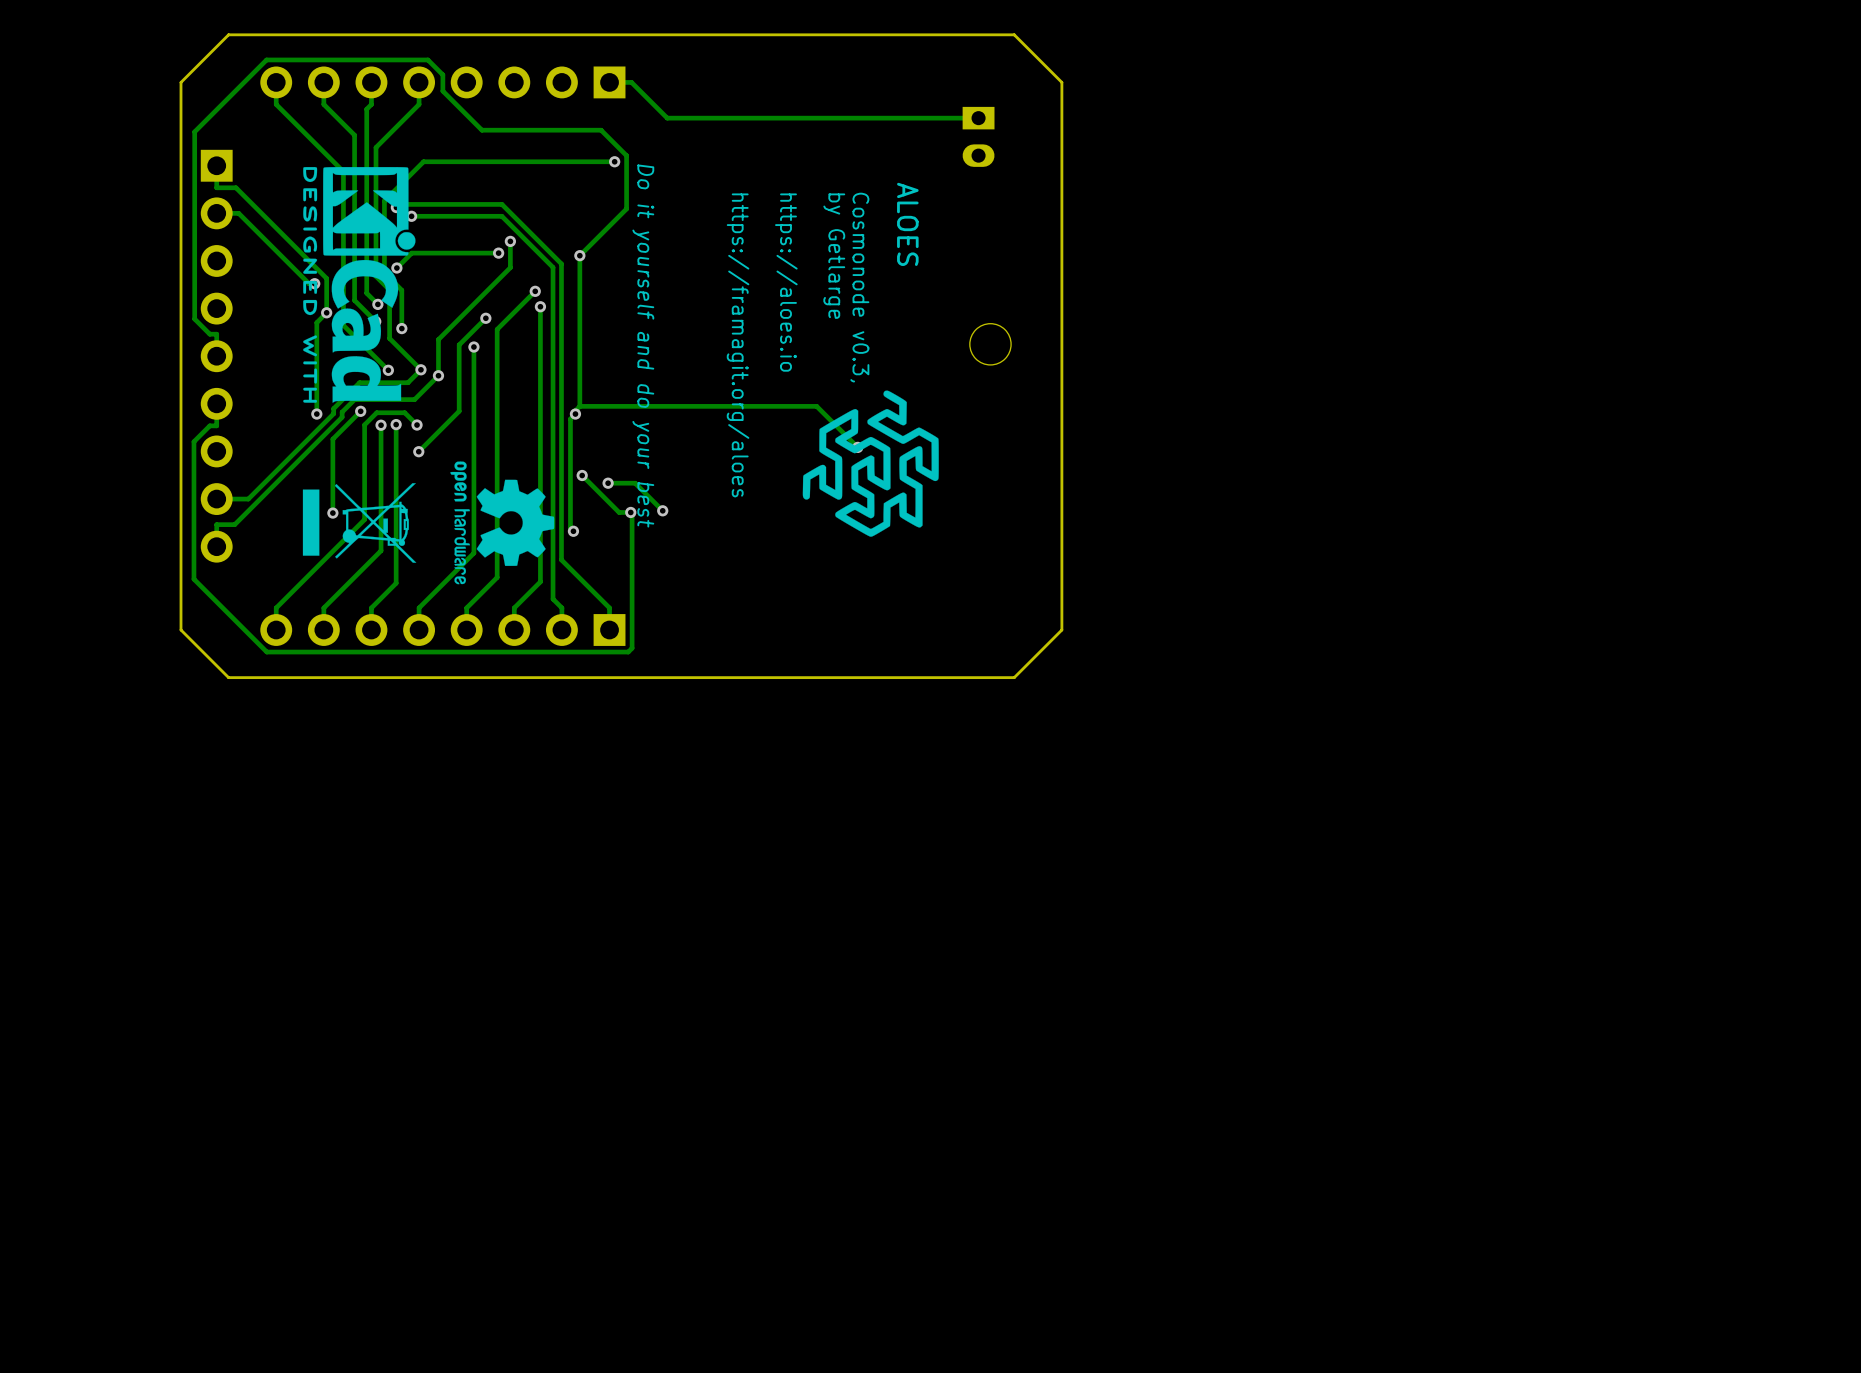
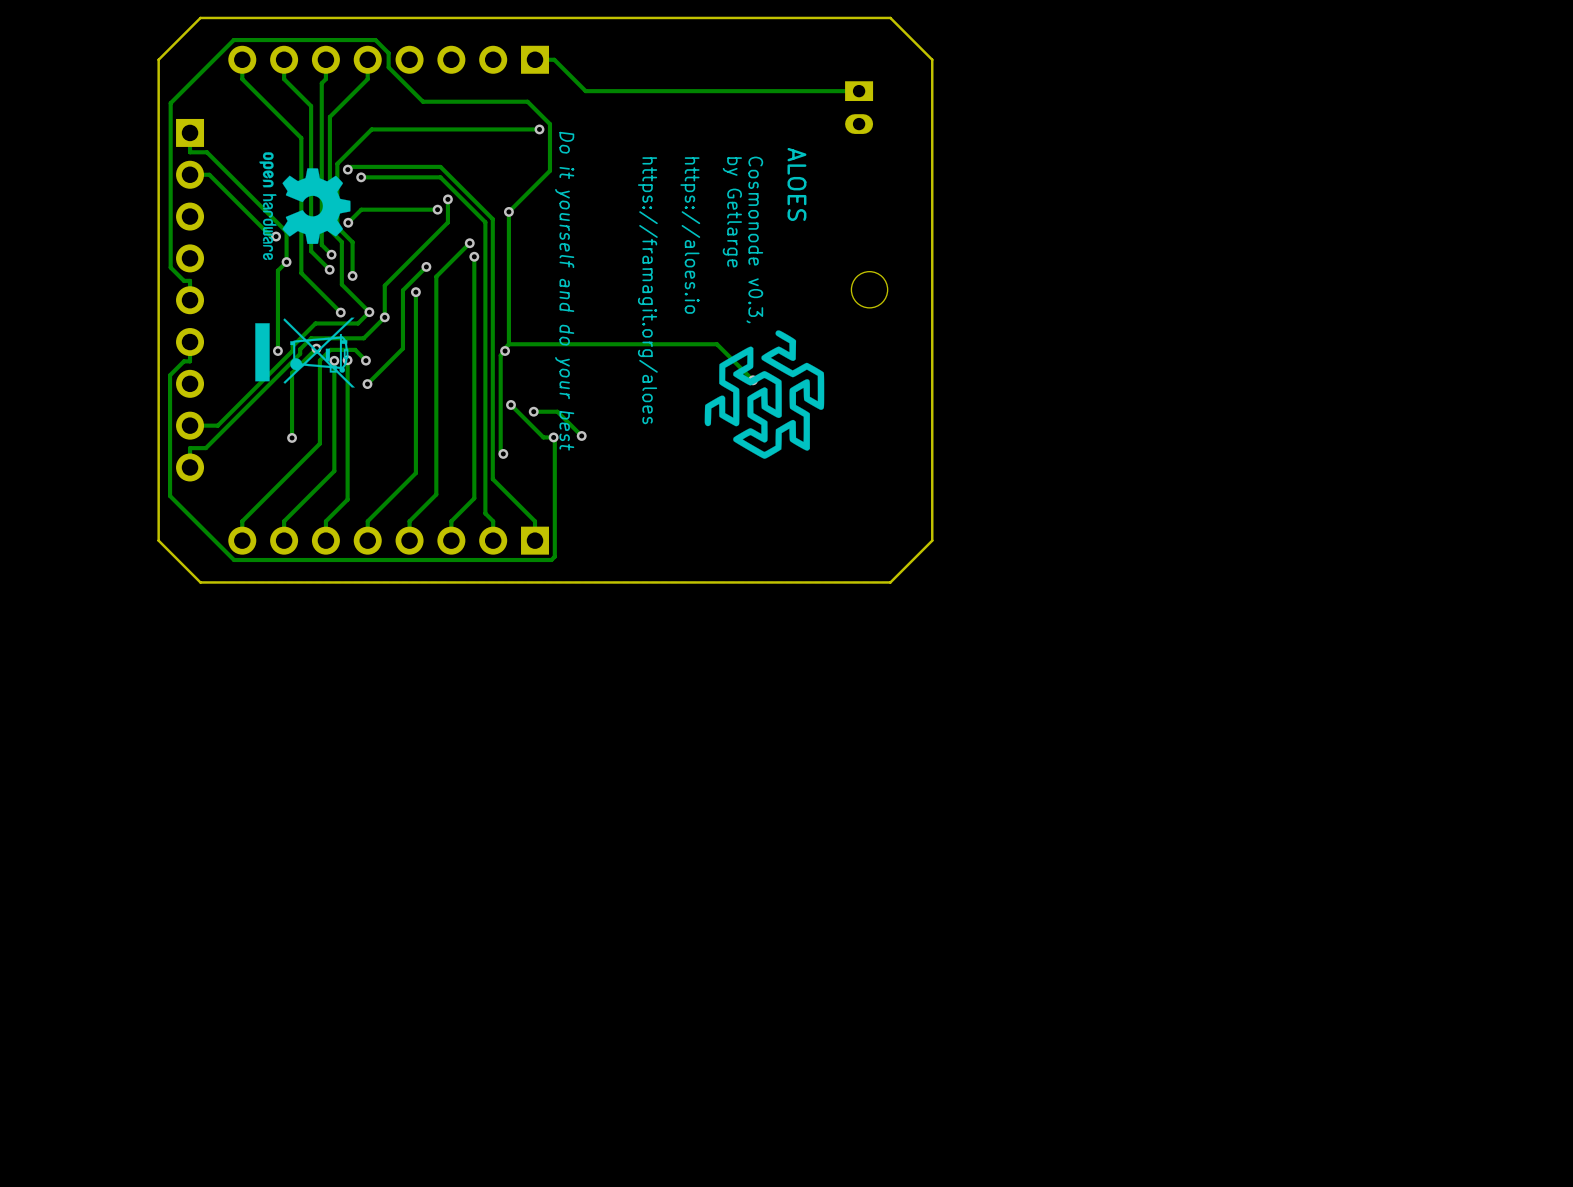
drawing: [303, 167, 416, 403] -> none
drawing position: (359, 522) -> (305, 352)
drawing position: (502, 522) -> (304, 206)

